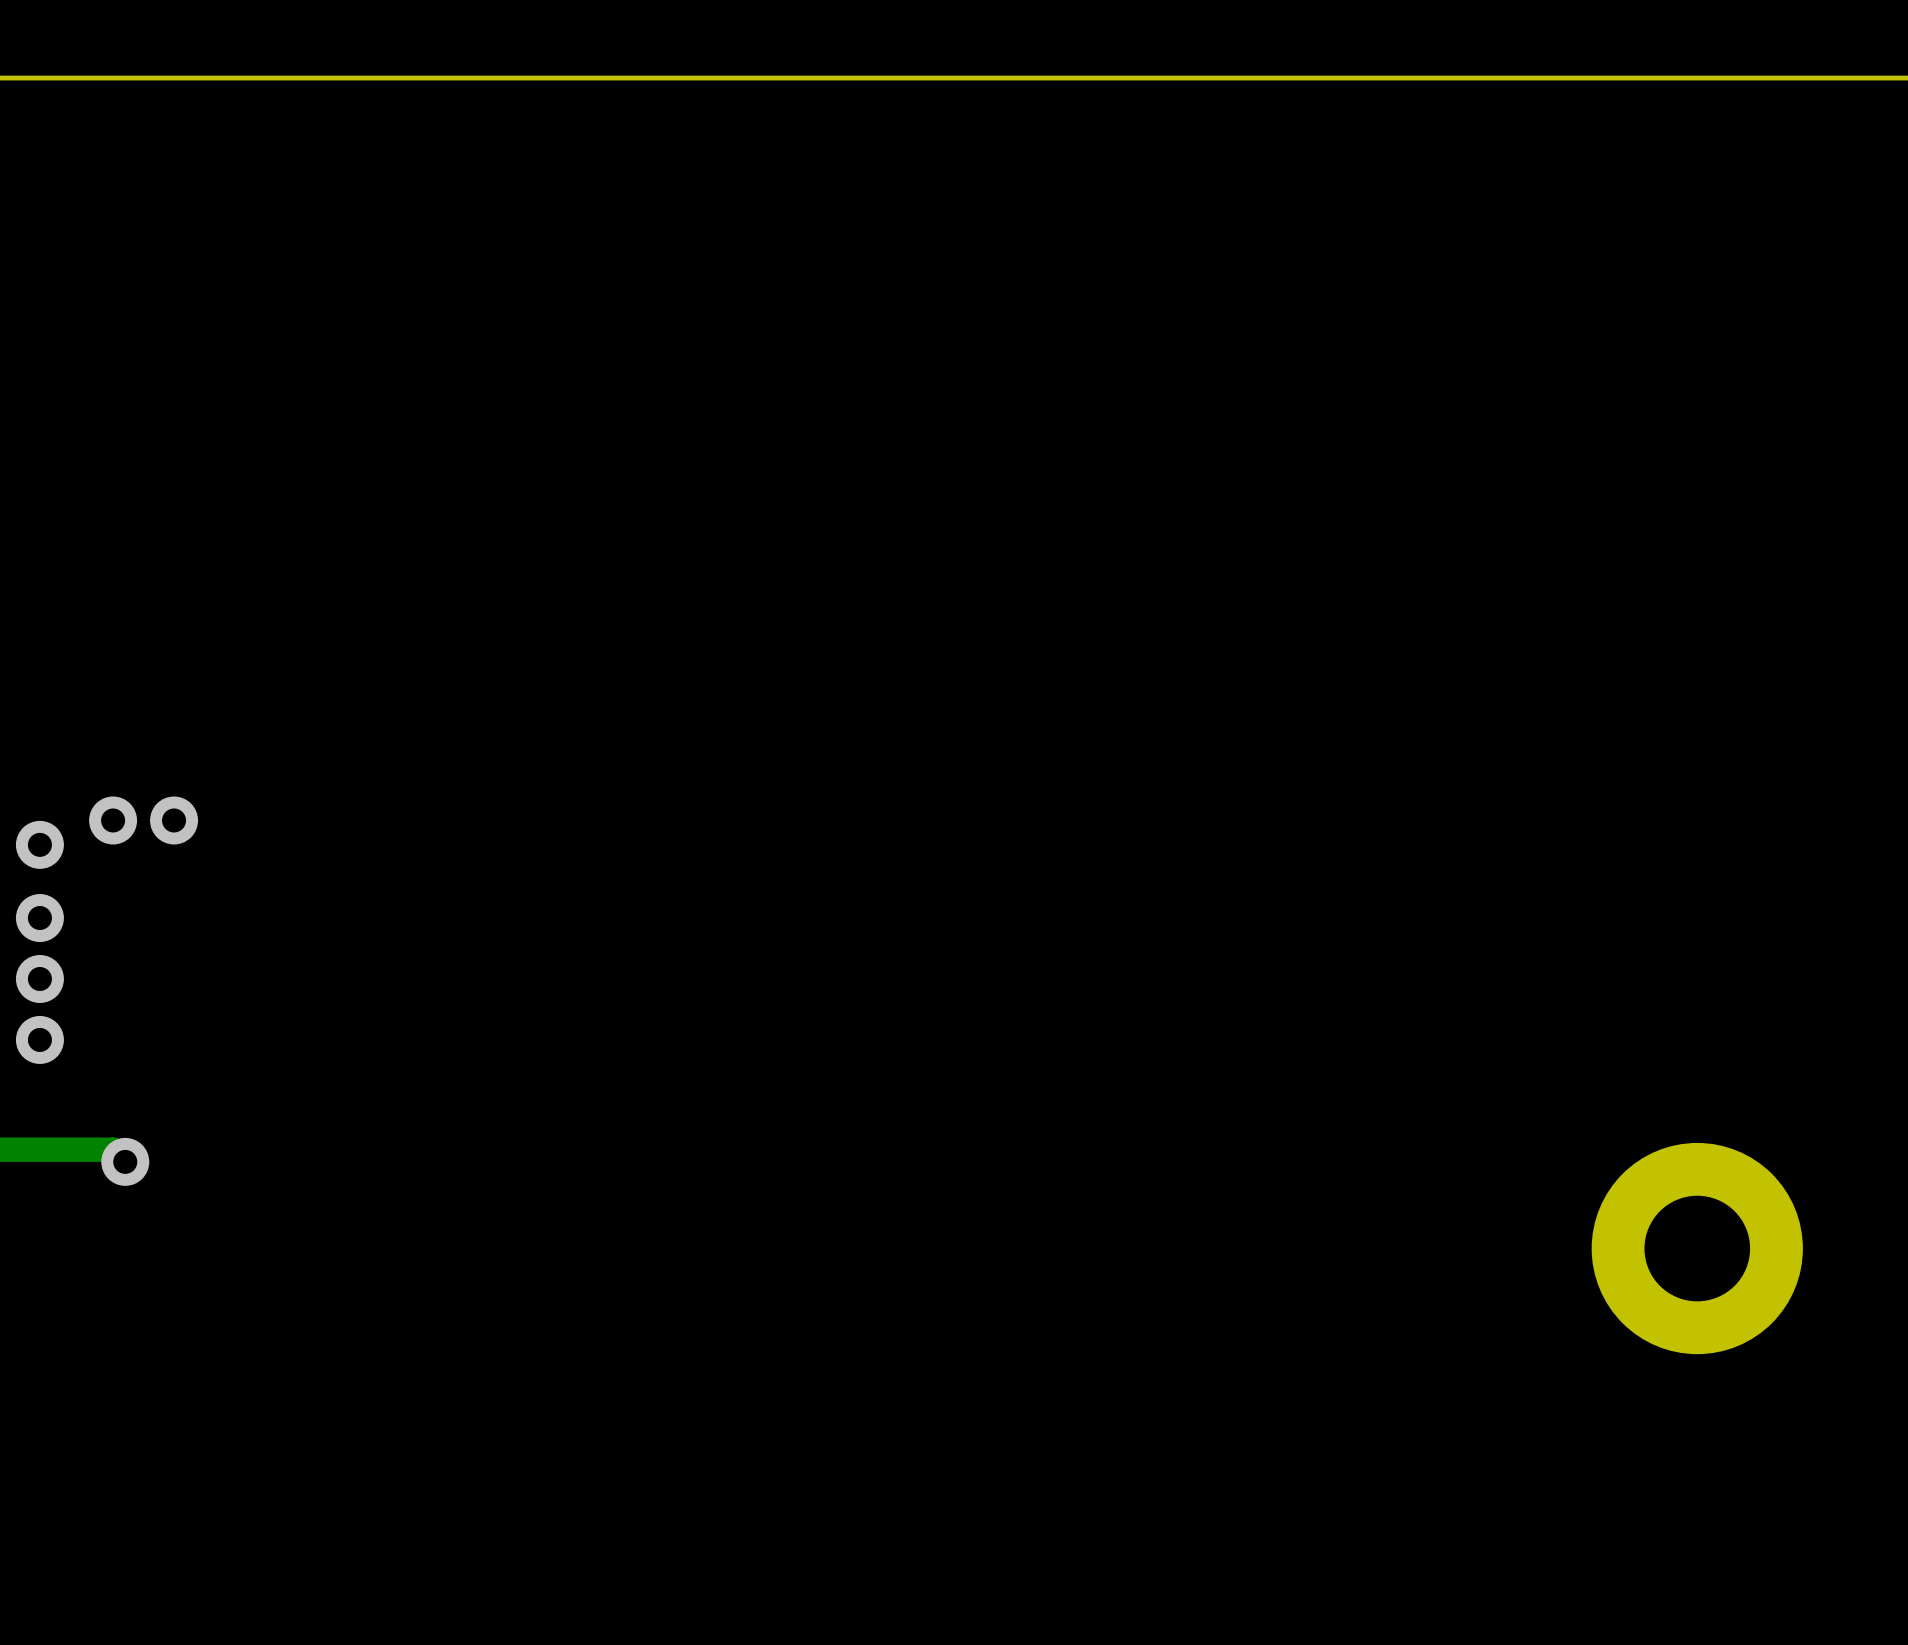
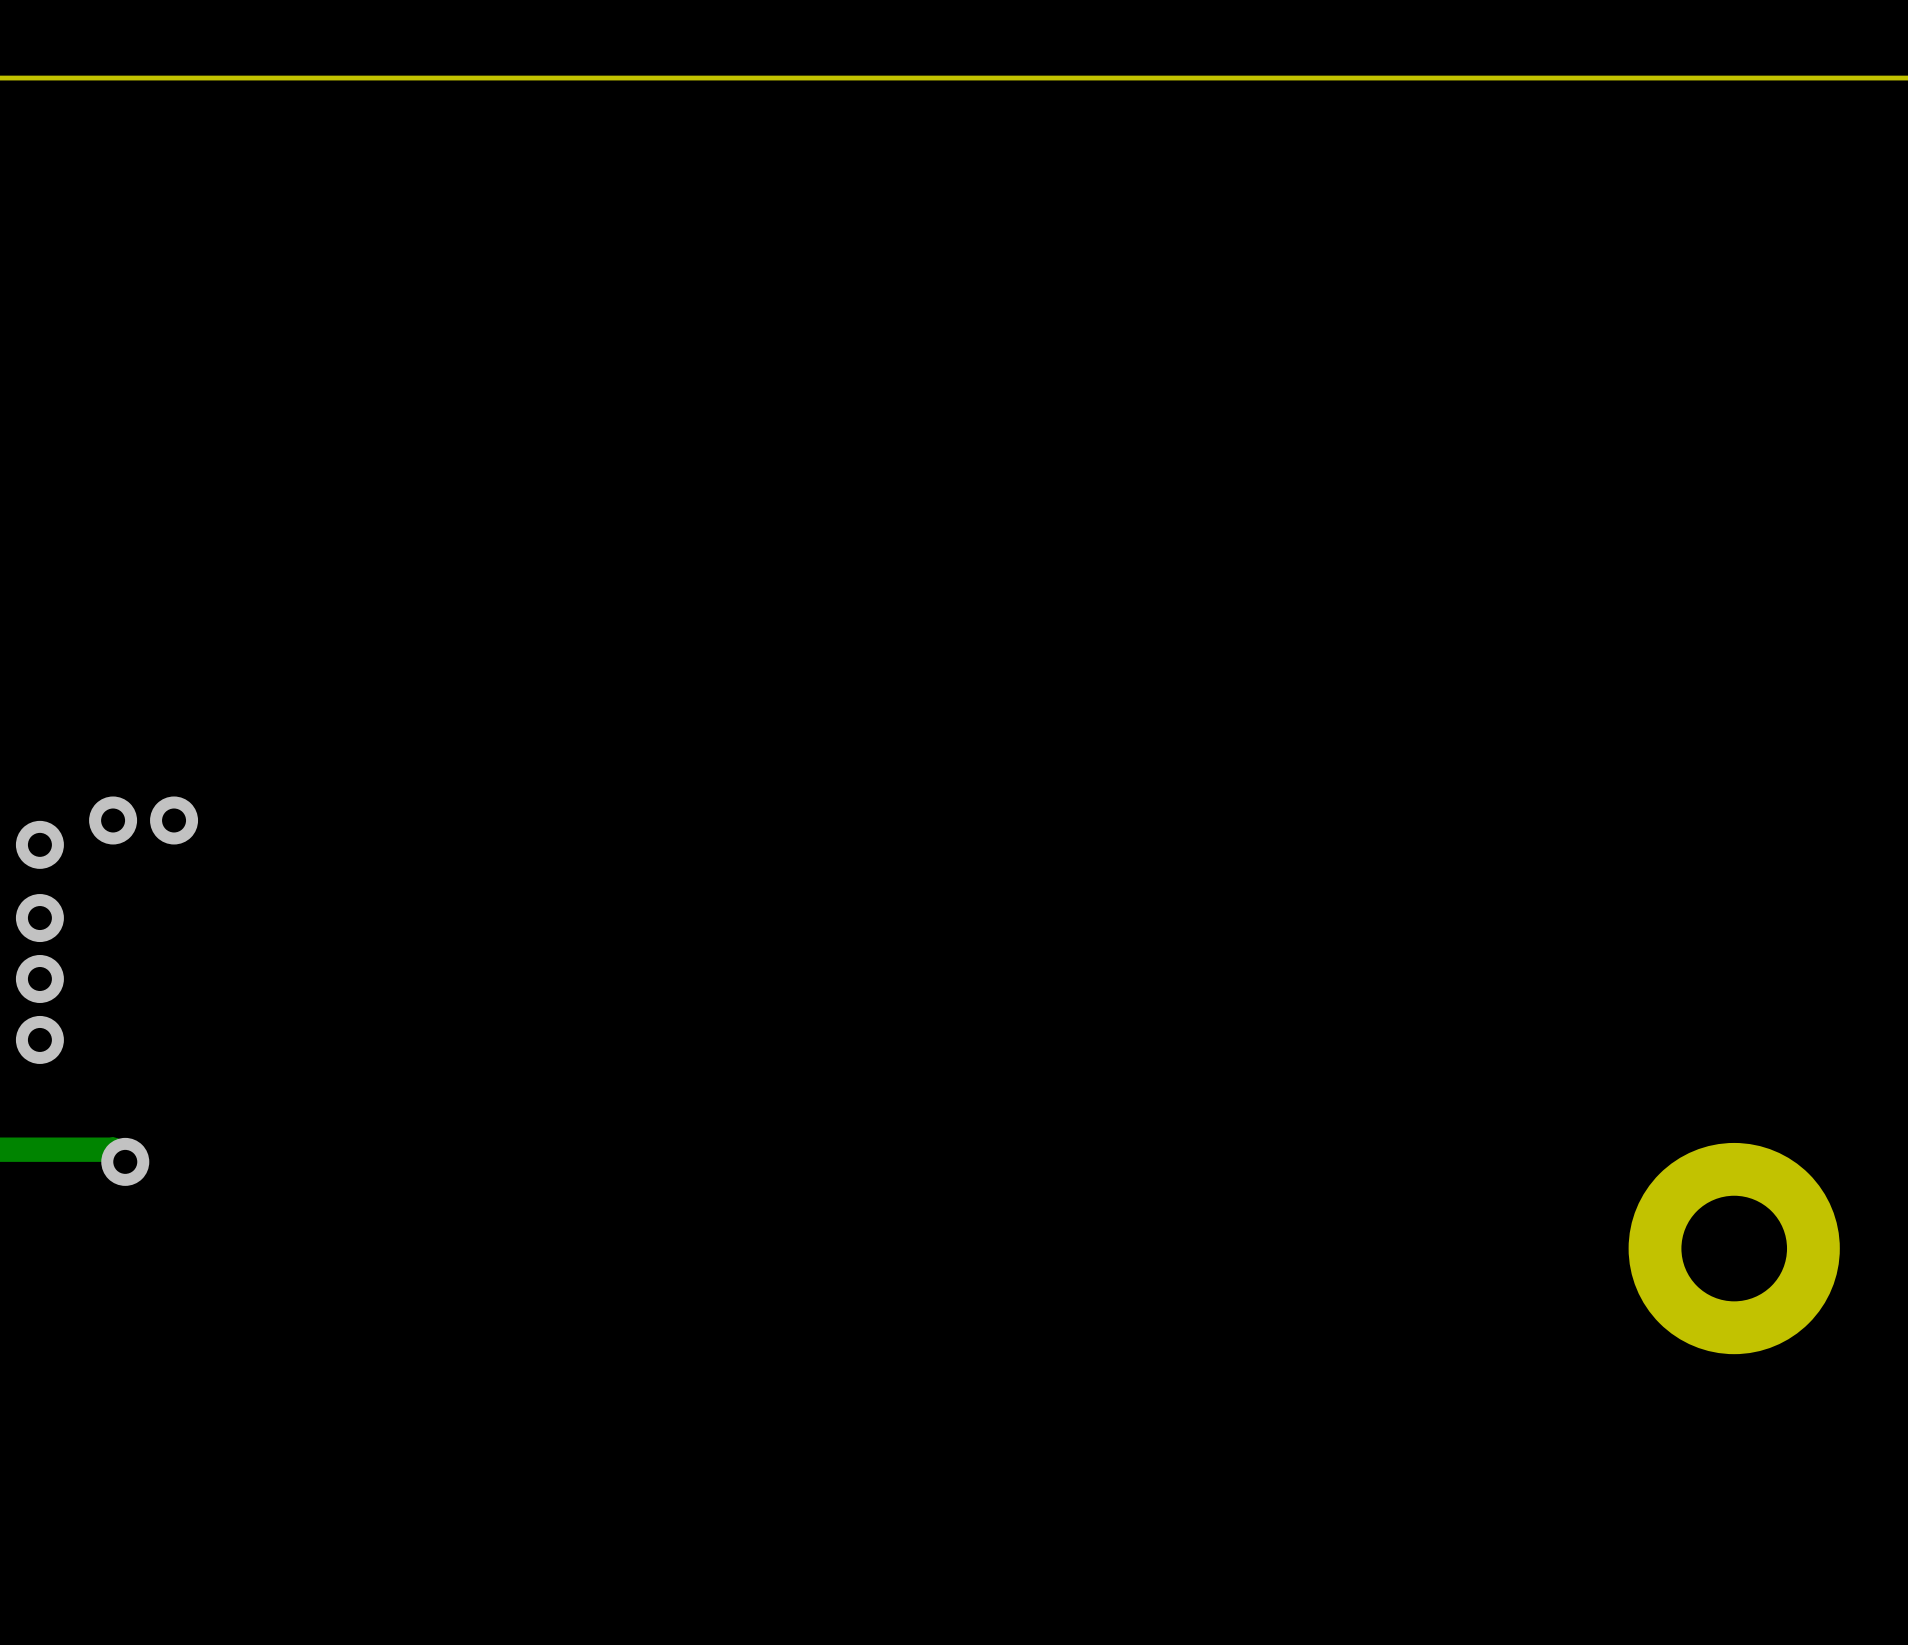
part position: (1697, 1248) -> (1734, 1248)

